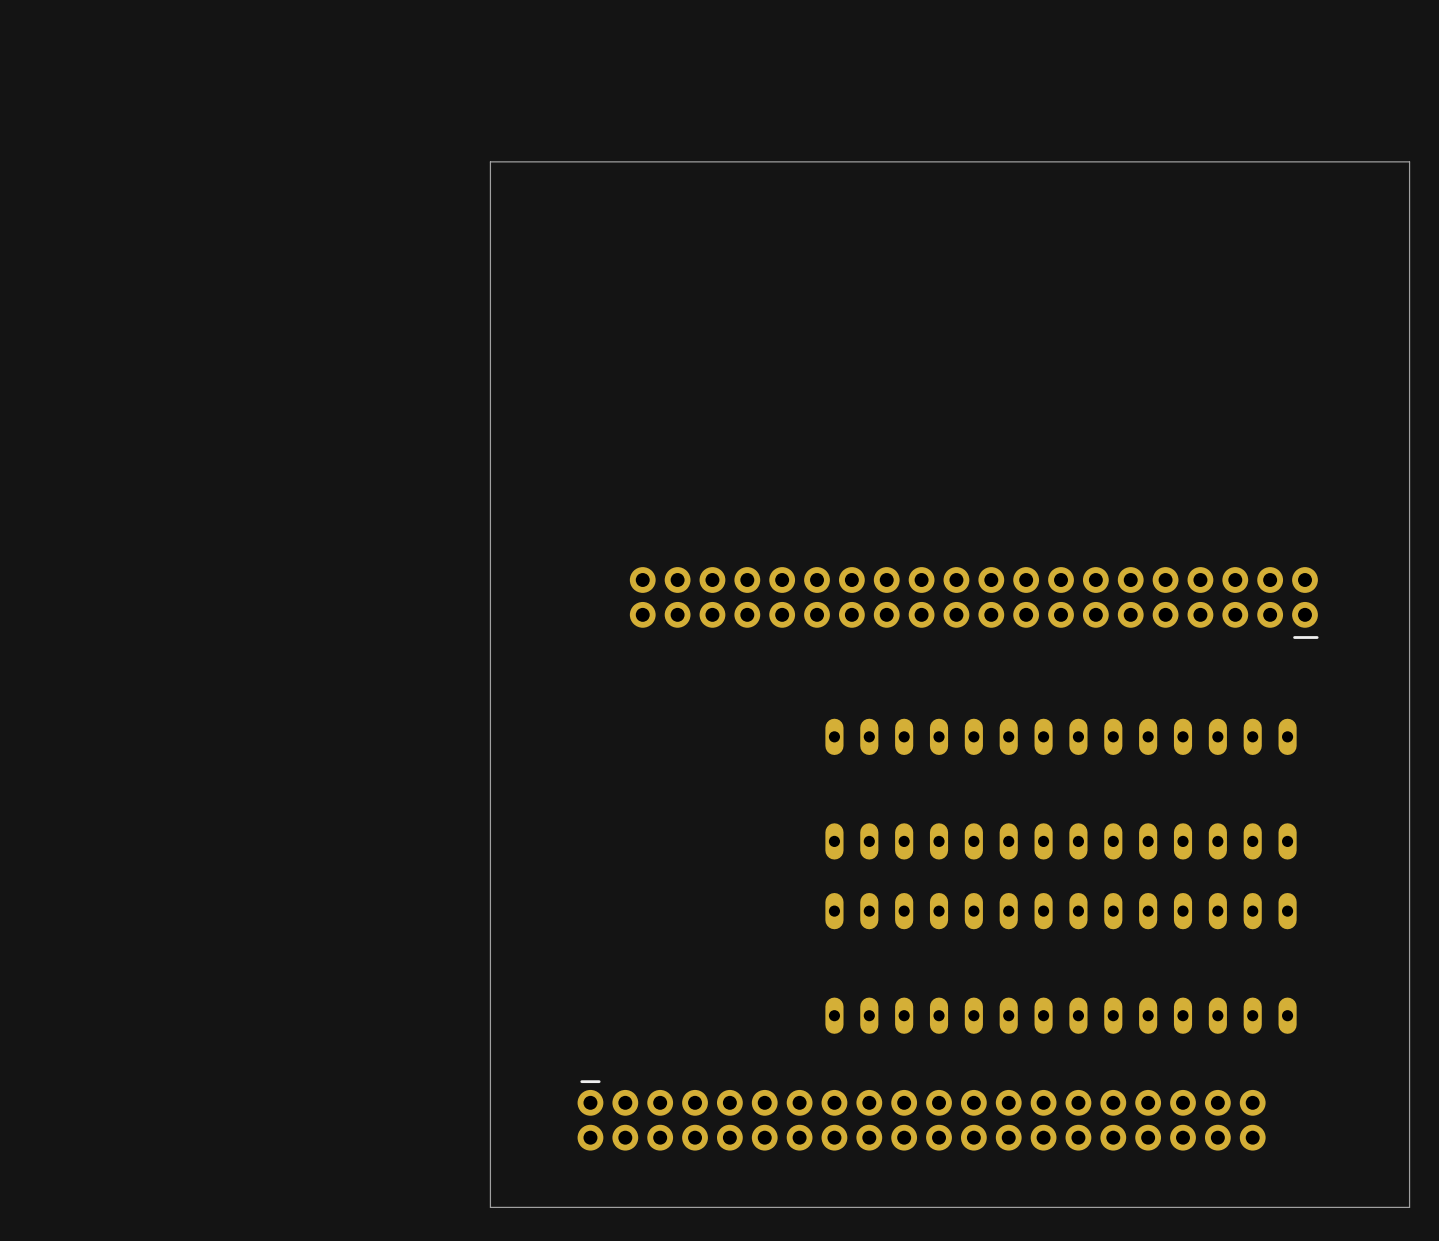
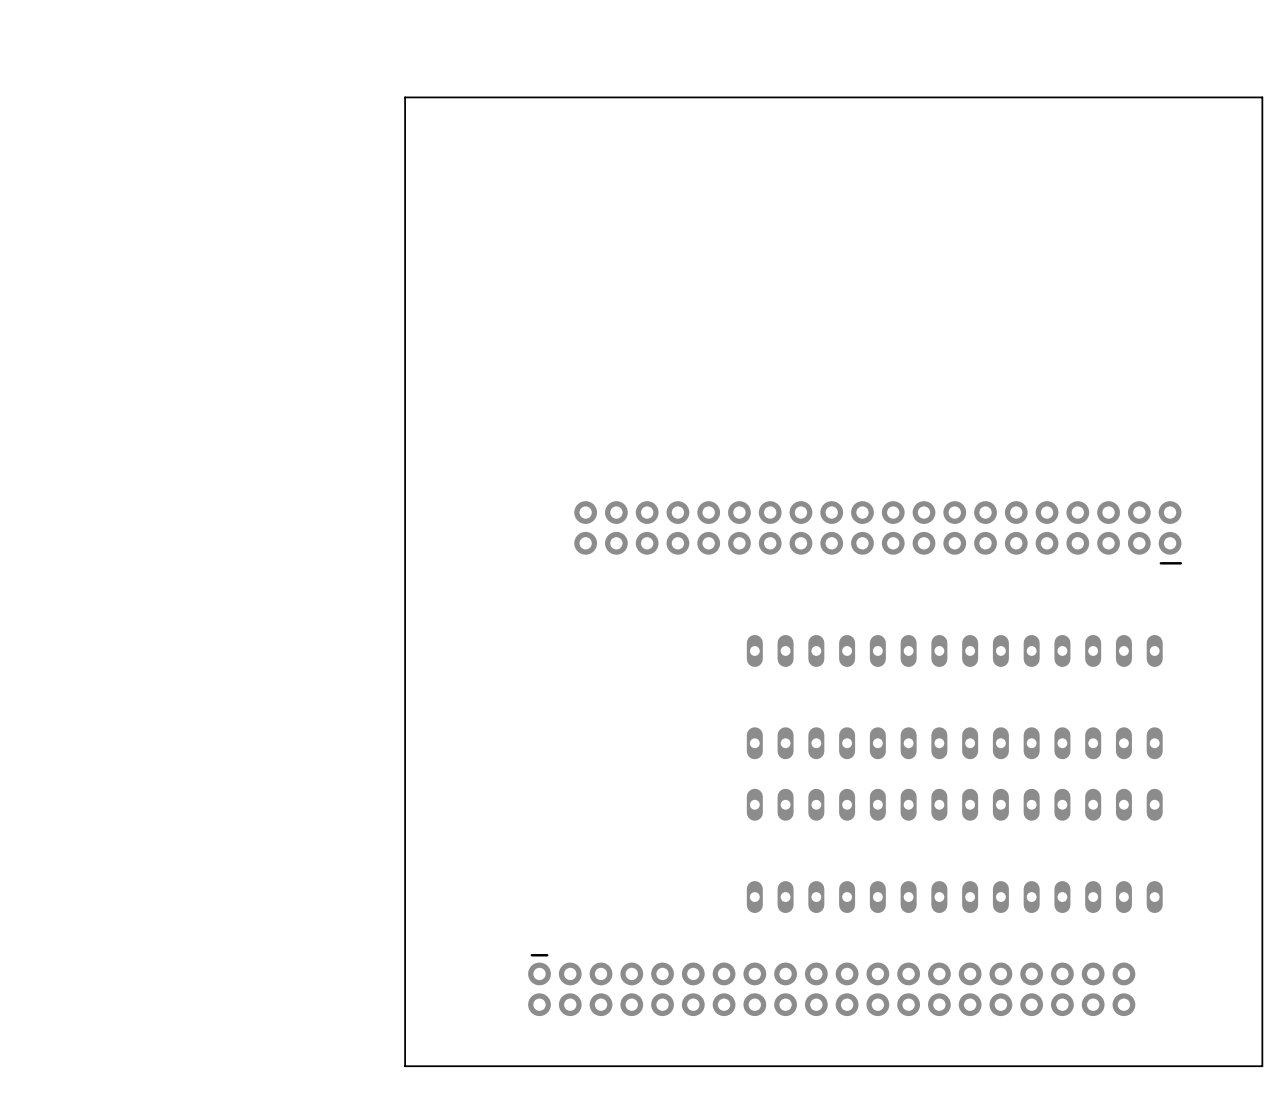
board edge: (1409, 161) (490, 161) (490, 1207) -> (1262, 143) (1262, 97) (405, 97) (405, 1066) (451, 1066)

